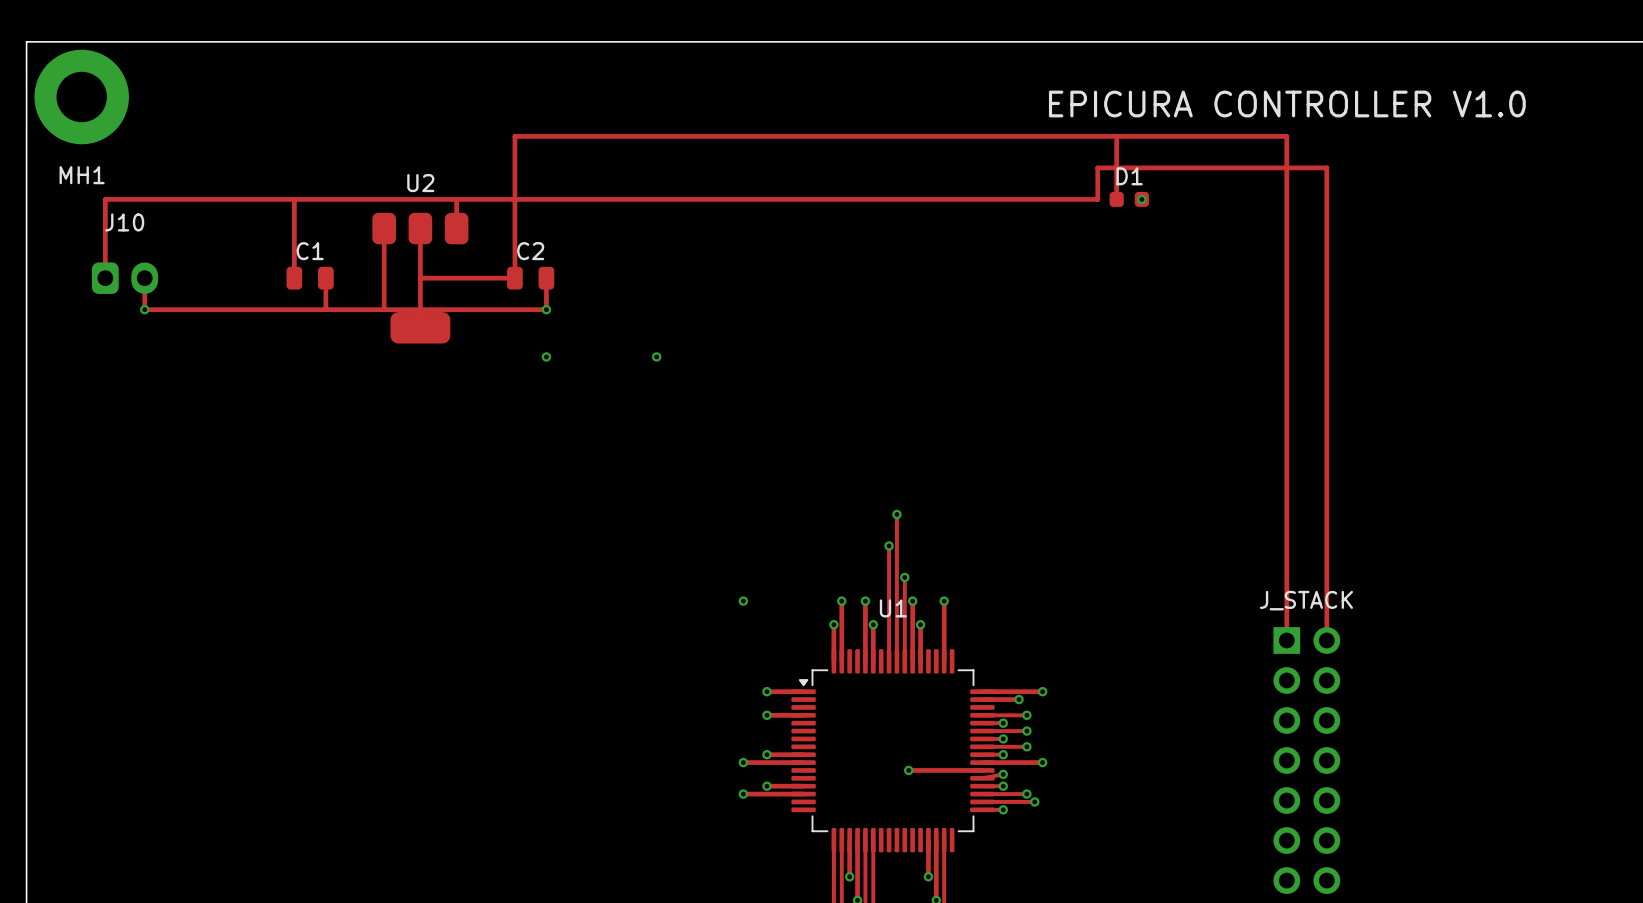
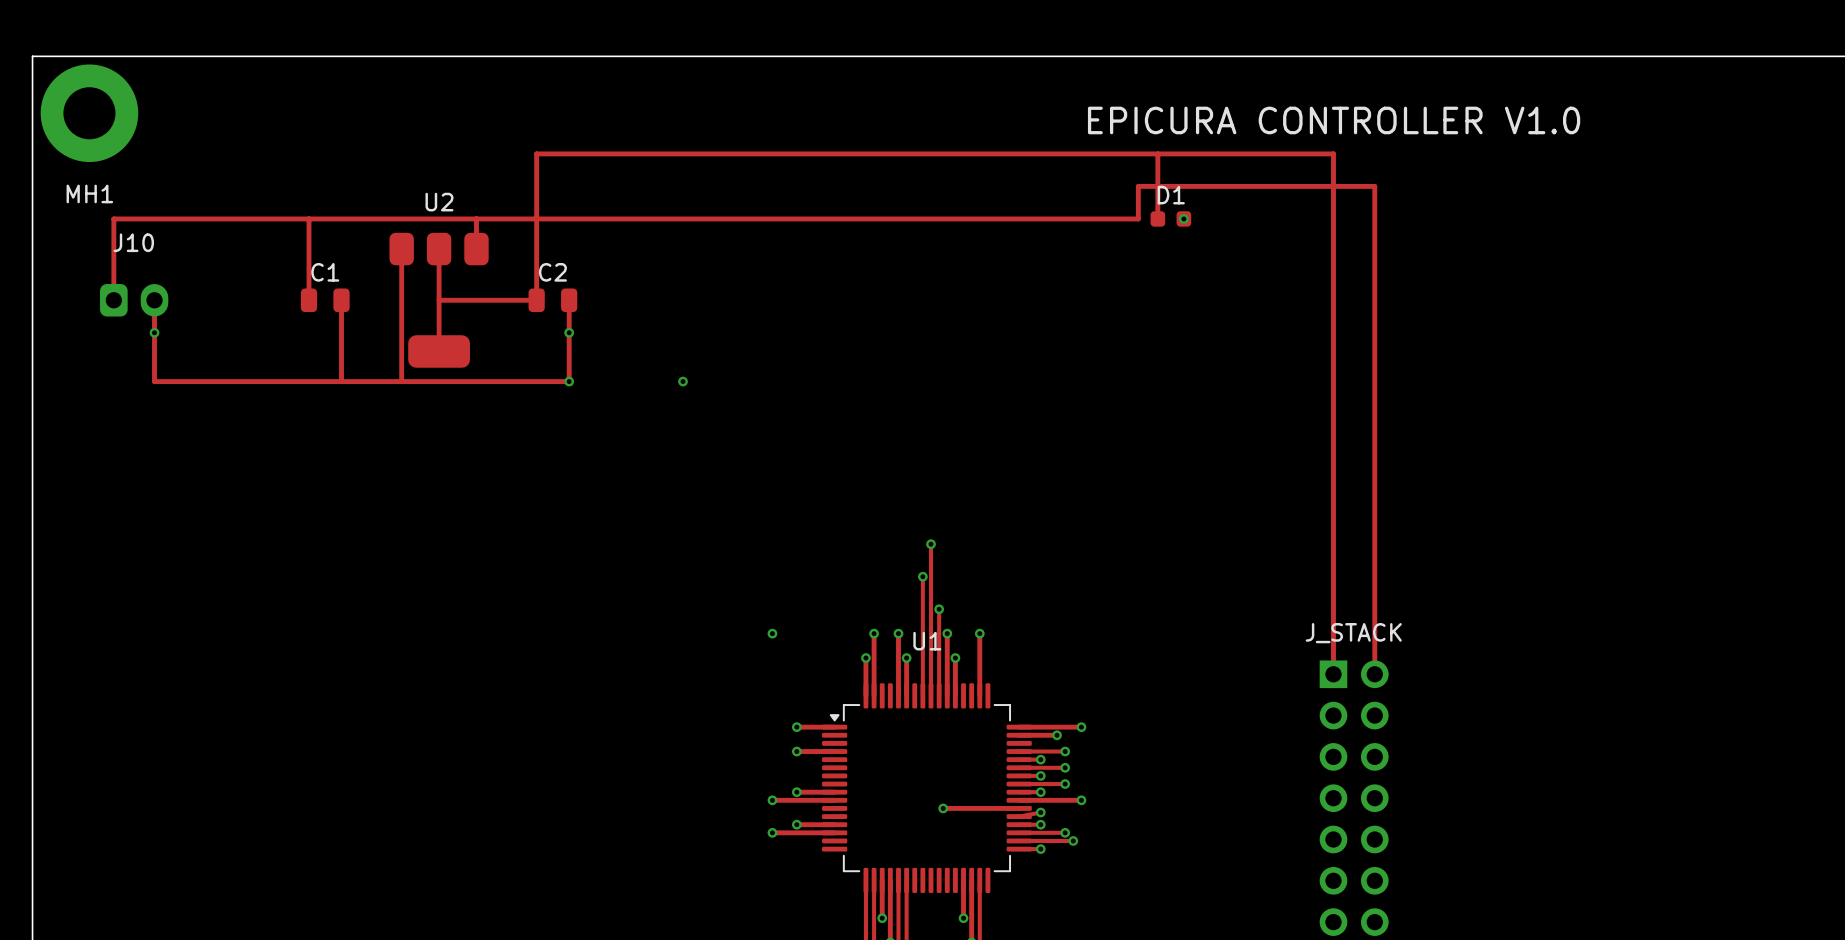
track: (144, 309) (546, 309) -> (154, 332) (154, 381) (569, 381) (569, 332)
track: none -> (341, 332) (341, 381)
track: none -> (401, 332) (401, 381)

